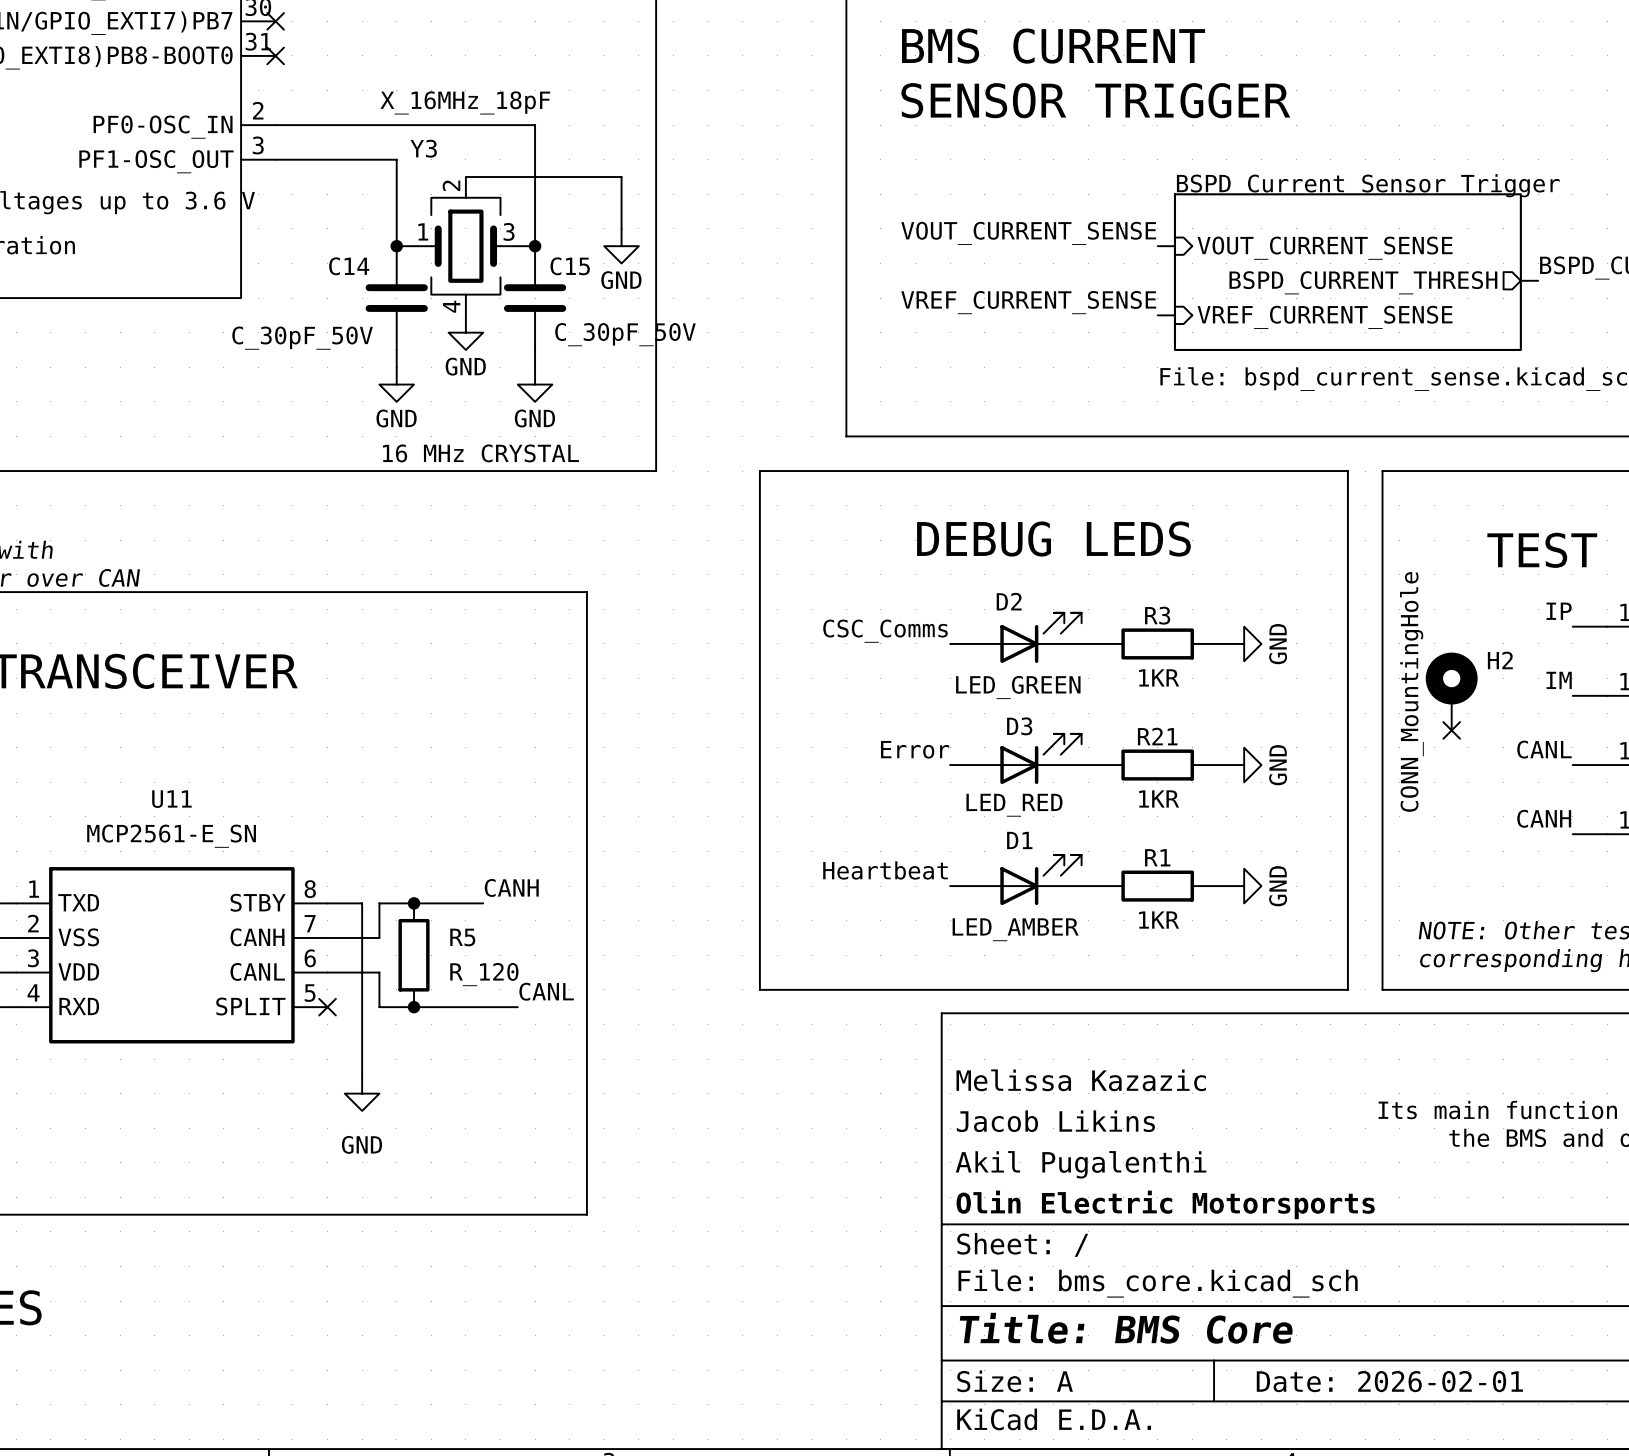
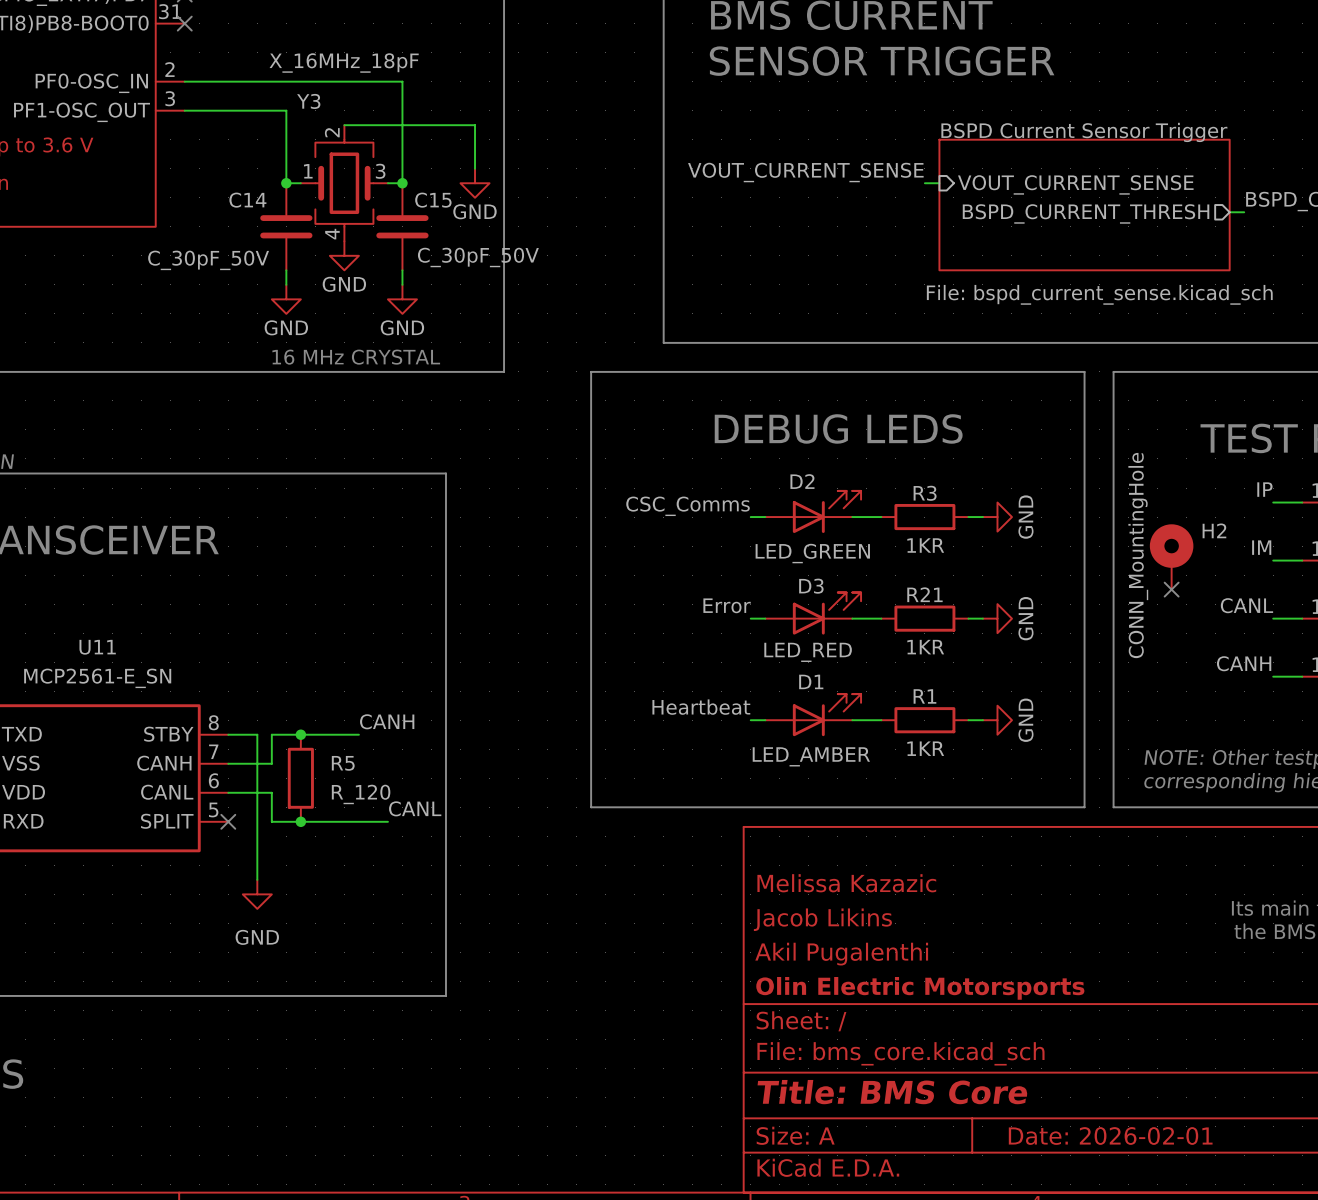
label: VREF_CURRENT_SENSE (1028, 302) -> none
wire: (1157, 315) (1174, 315) -> none
sheet pin: VREF_CURRENT_SENSE (1325, 317) -> none

